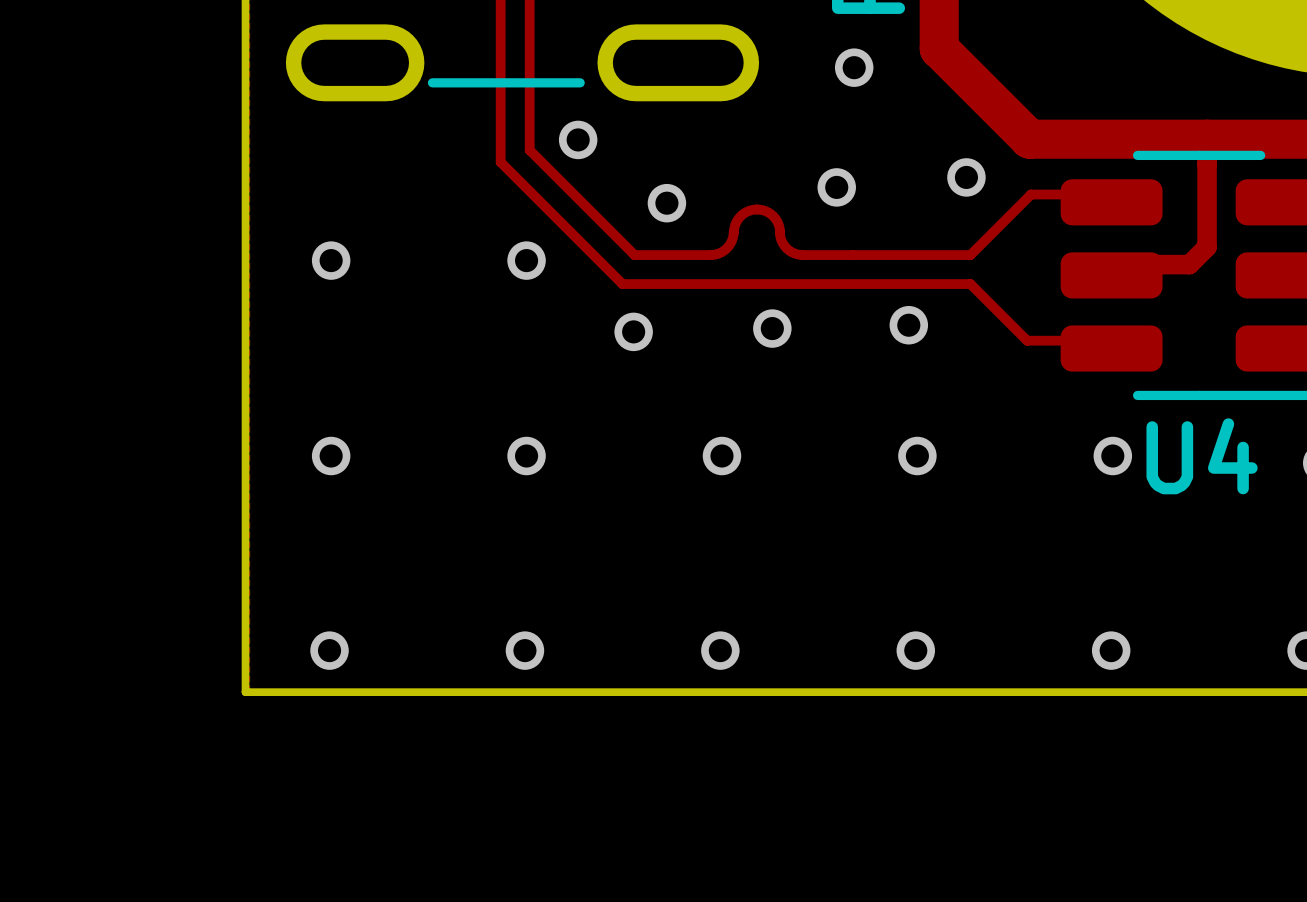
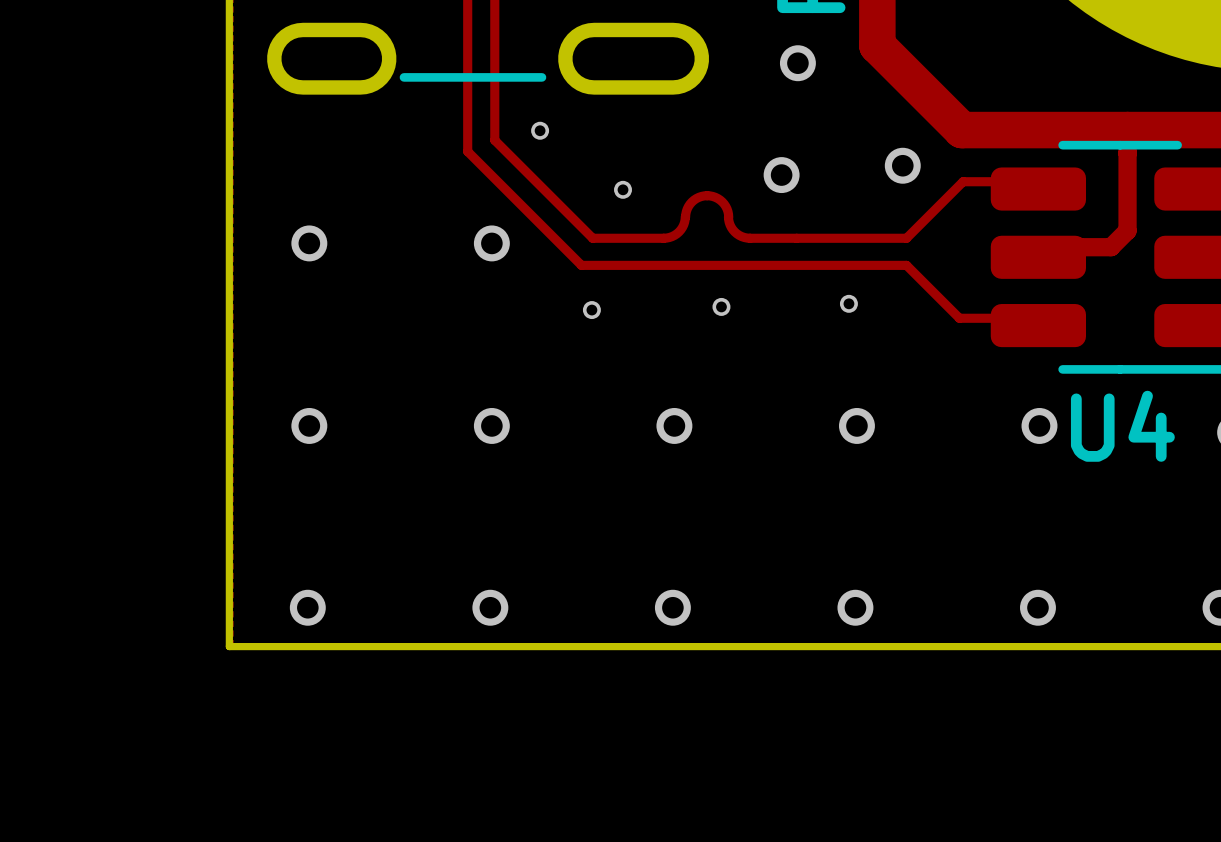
via size: [558, 120, 598, 160] -> [531, 121, 550, 140]
via size: [647, 183, 687, 223] -> [614, 180, 632, 199]
via size: [889, 305, 929, 345] -> [839, 294, 858, 313]
via size: [753, 309, 792, 348] -> [712, 297, 731, 316]
via size: [614, 312, 653, 352] -> [582, 301, 601, 320]

